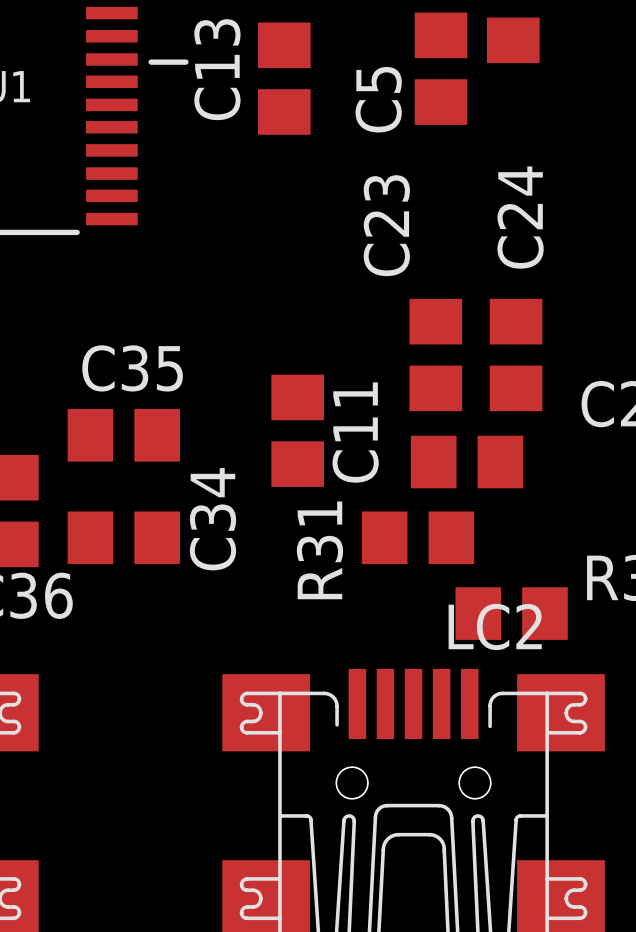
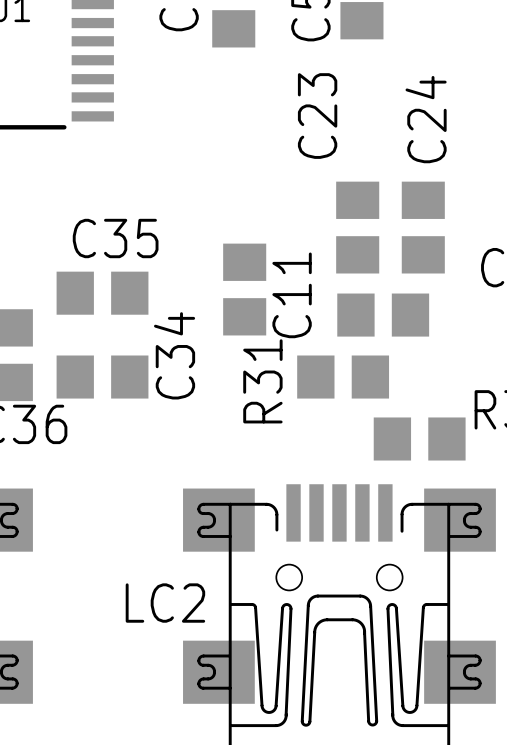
LC2 name position: LC2 (495, 626) -> LC2 (165, 603)

